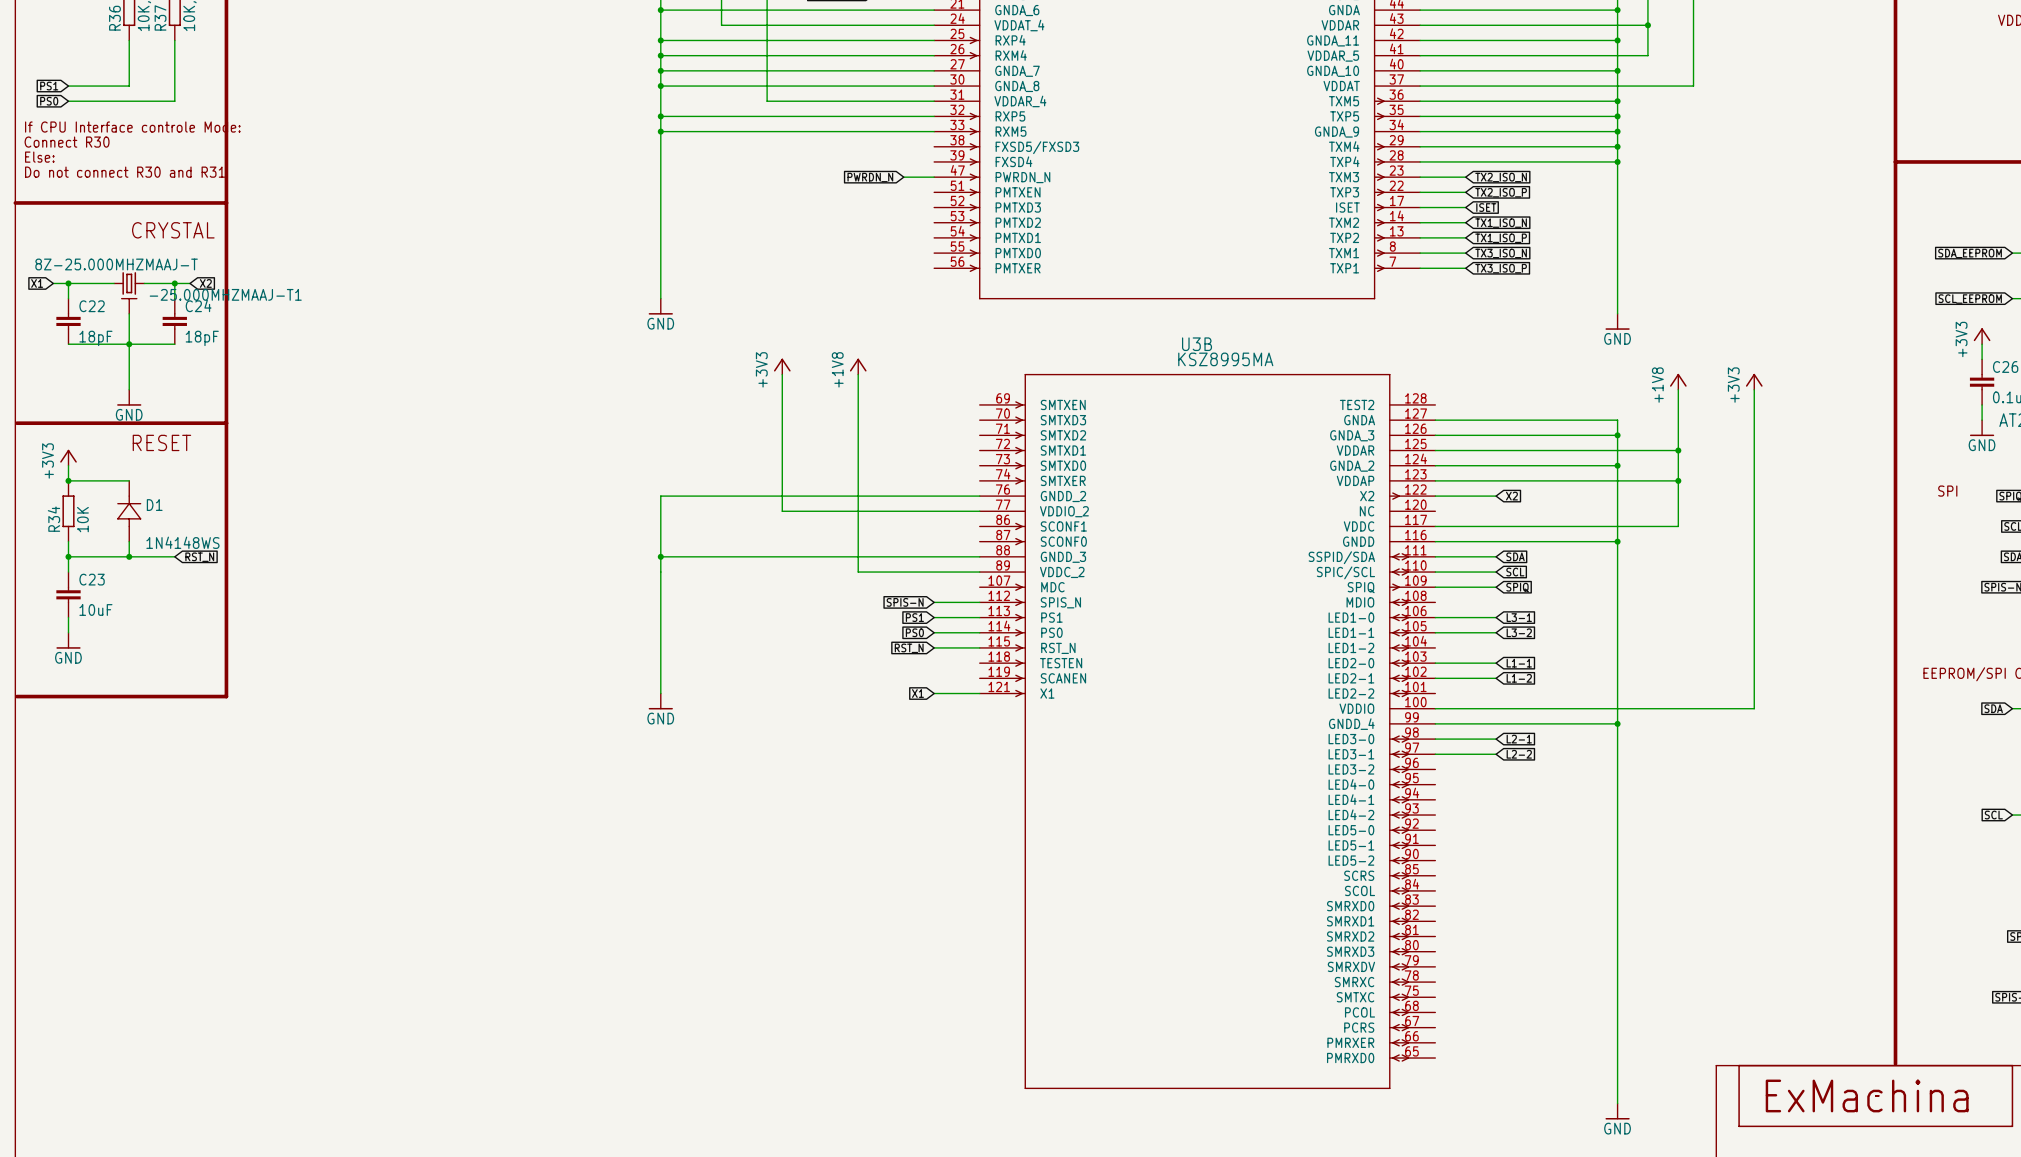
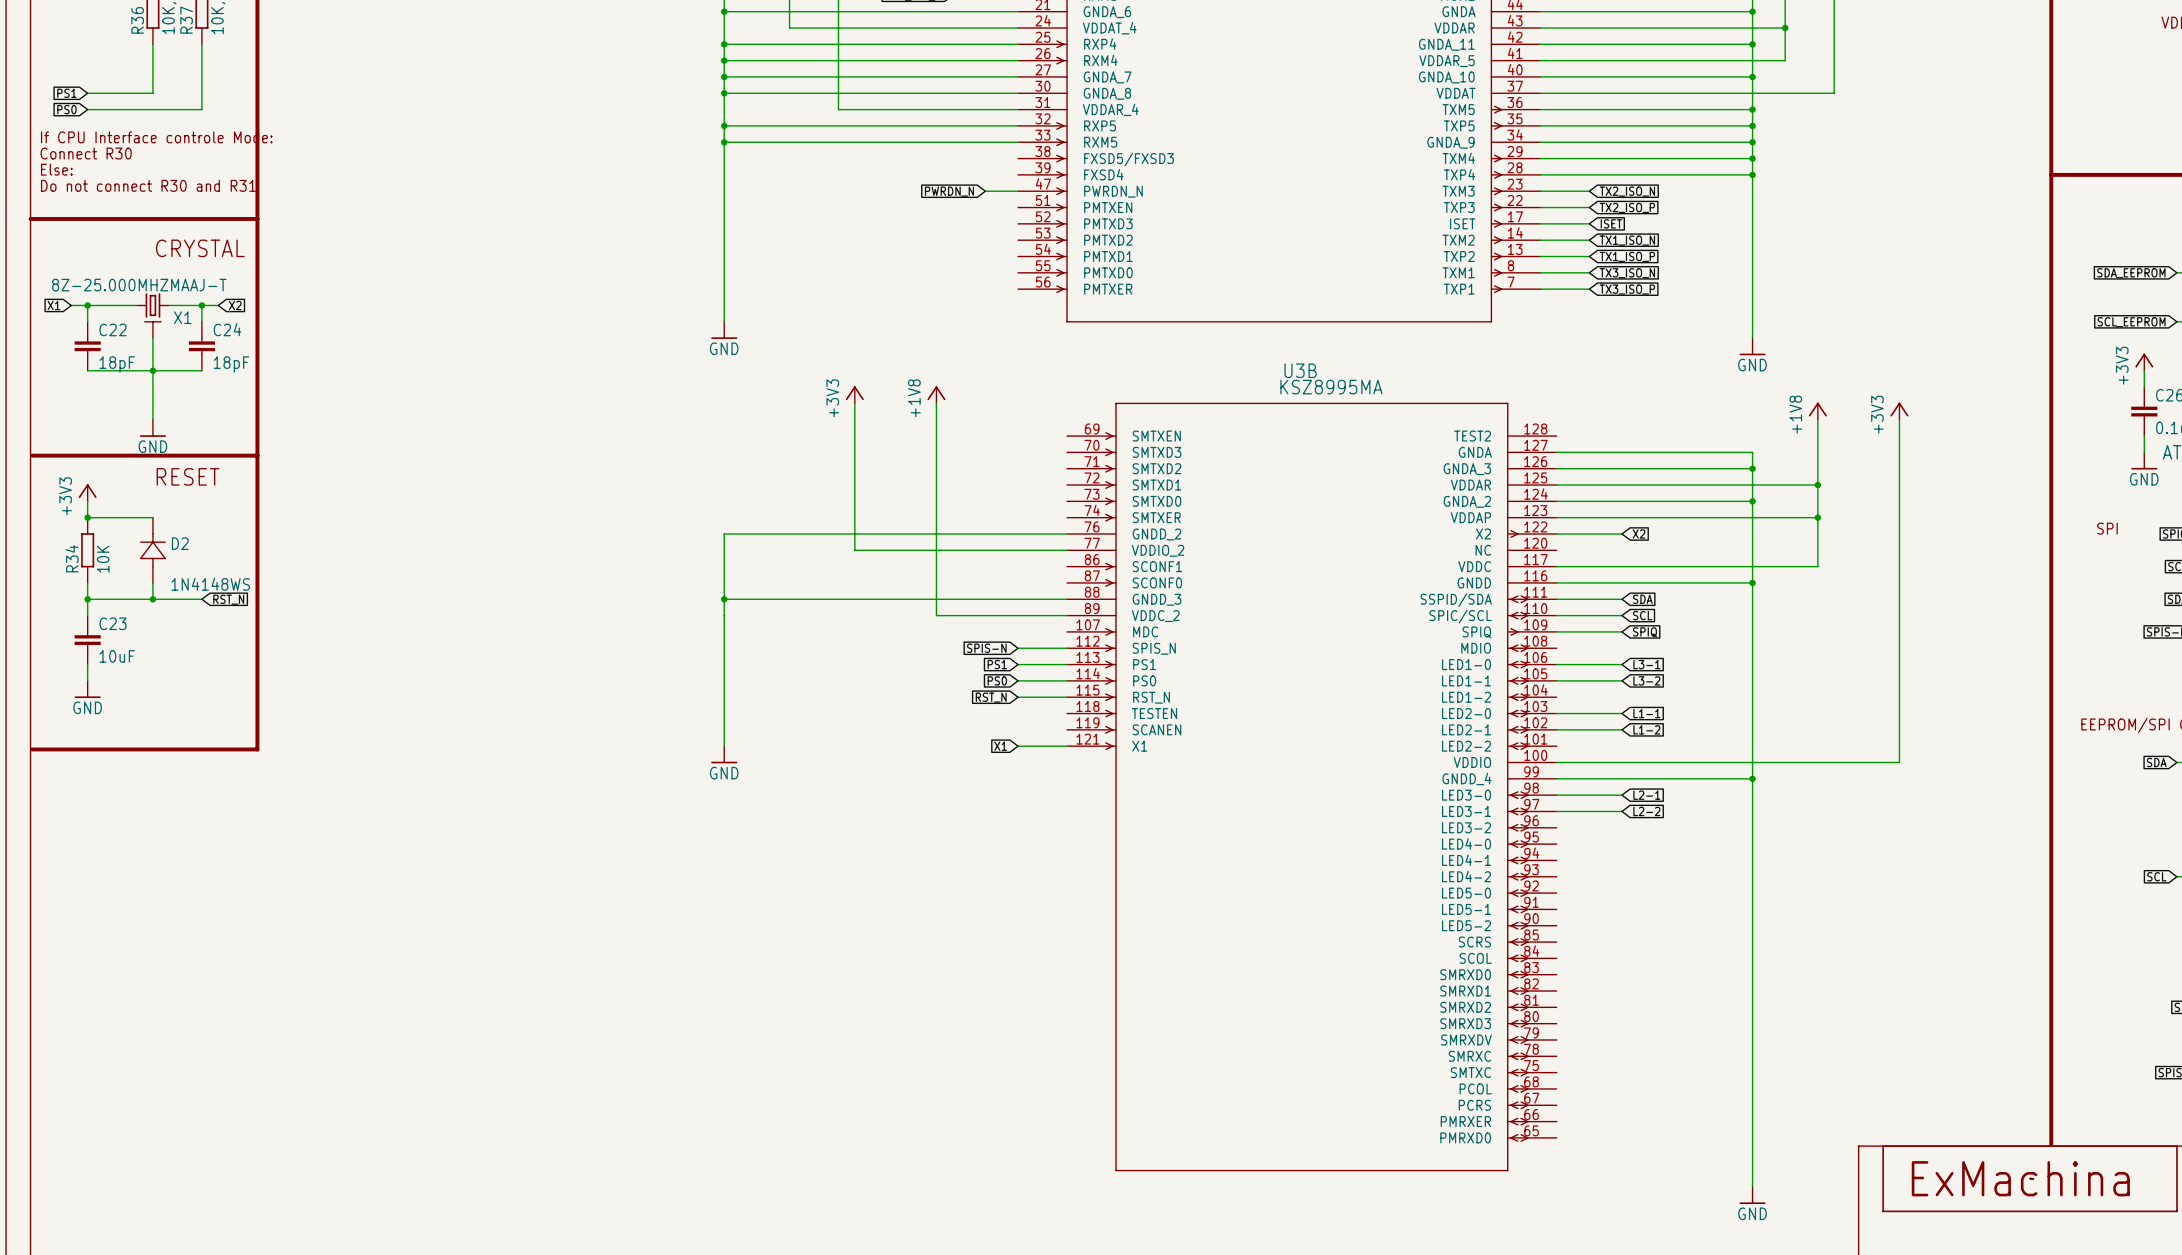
-25.000MHZMAAJ-T1 name: -25.000MHZMAAJ-T1 (225, 294) -> X1 (182, 317)
D1 name: D1 (154, 505) -> D2 (180, 543)

